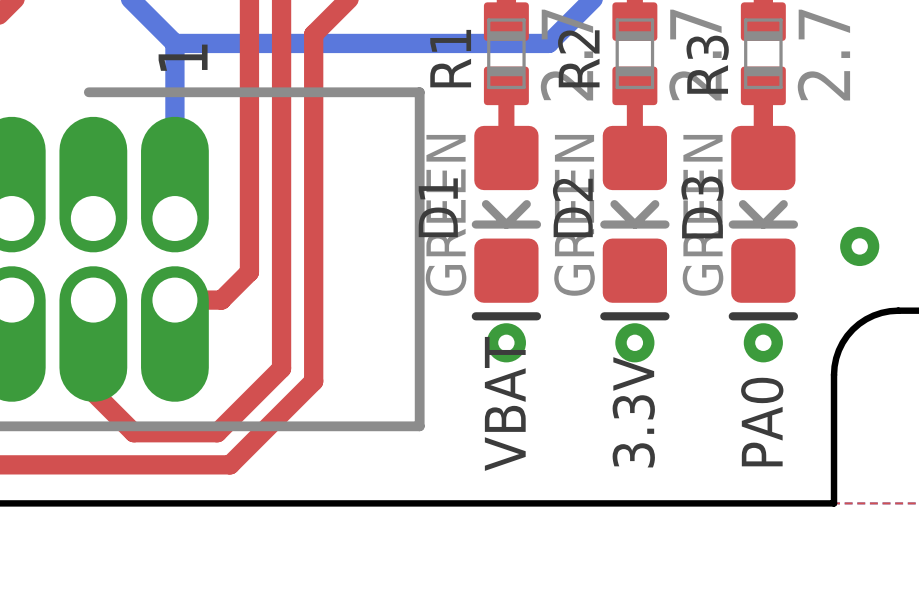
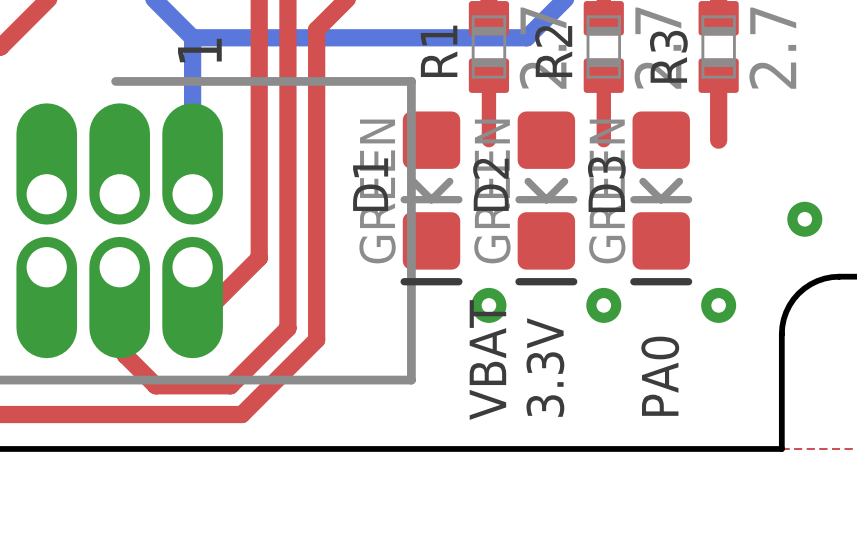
D1 position: (506, 223) -> (431, 198)
D2 position: (634, 223) -> (546, 198)
D3 position: (763, 223) -> (661, 198)
top track: (249, 272) (221, 300) (174, 300) -> (259, 242) (259, 258) (198, 318)
text position: 3.3V (633, 412) -> 3.3V (545, 367)
text position: PA0 (762, 422) -> PA0 (660, 376)

